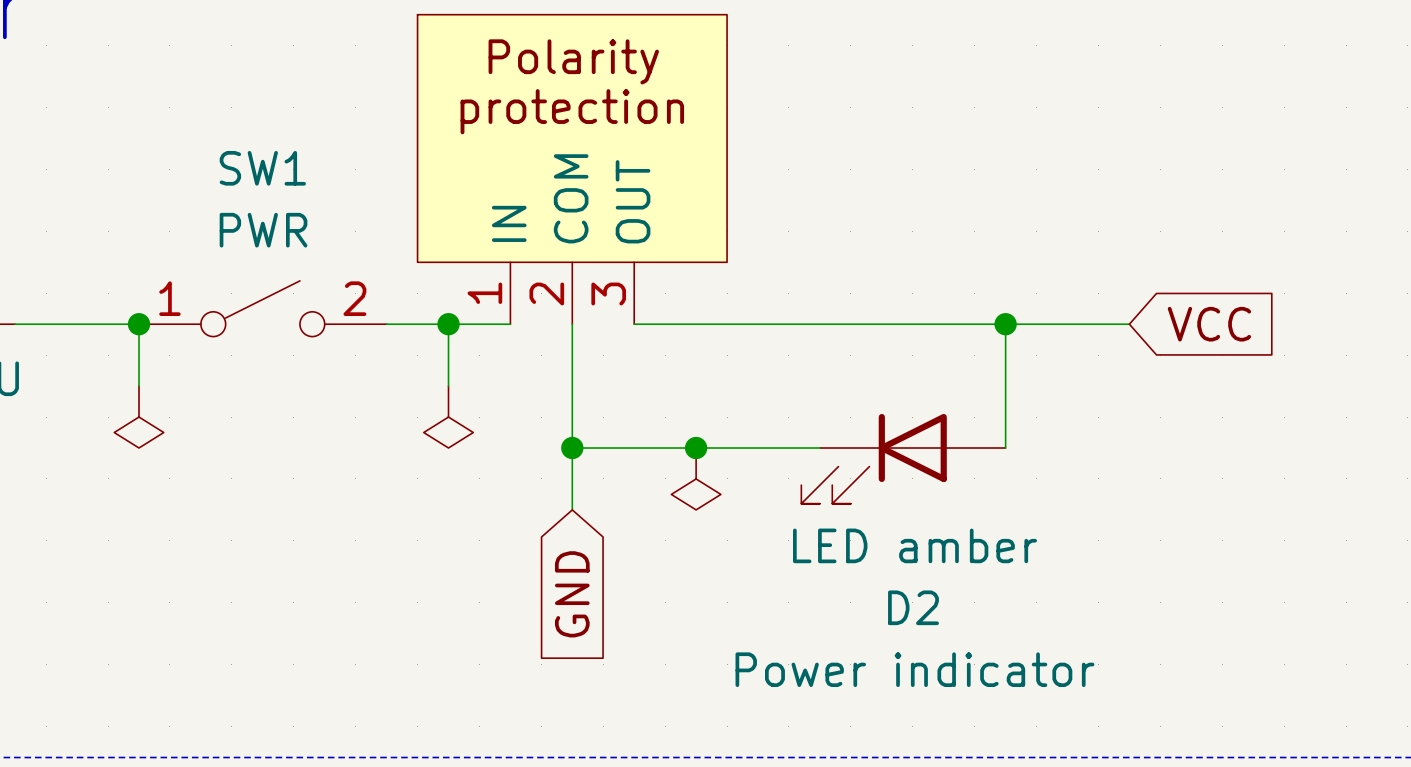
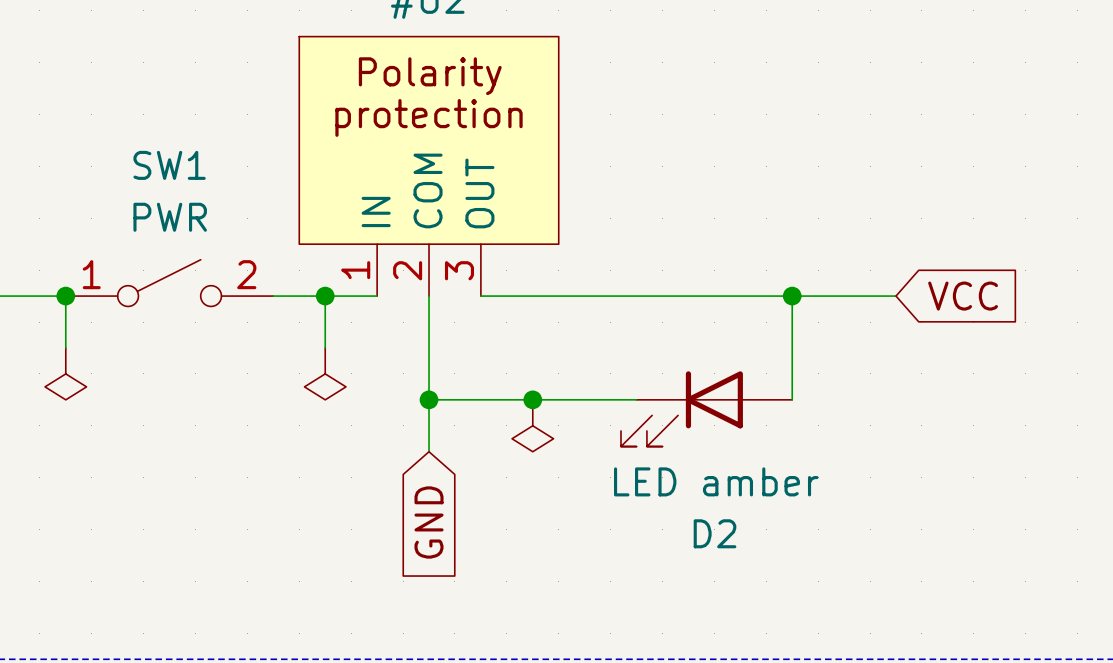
D2 text: Power indicator (914, 669) -> none

